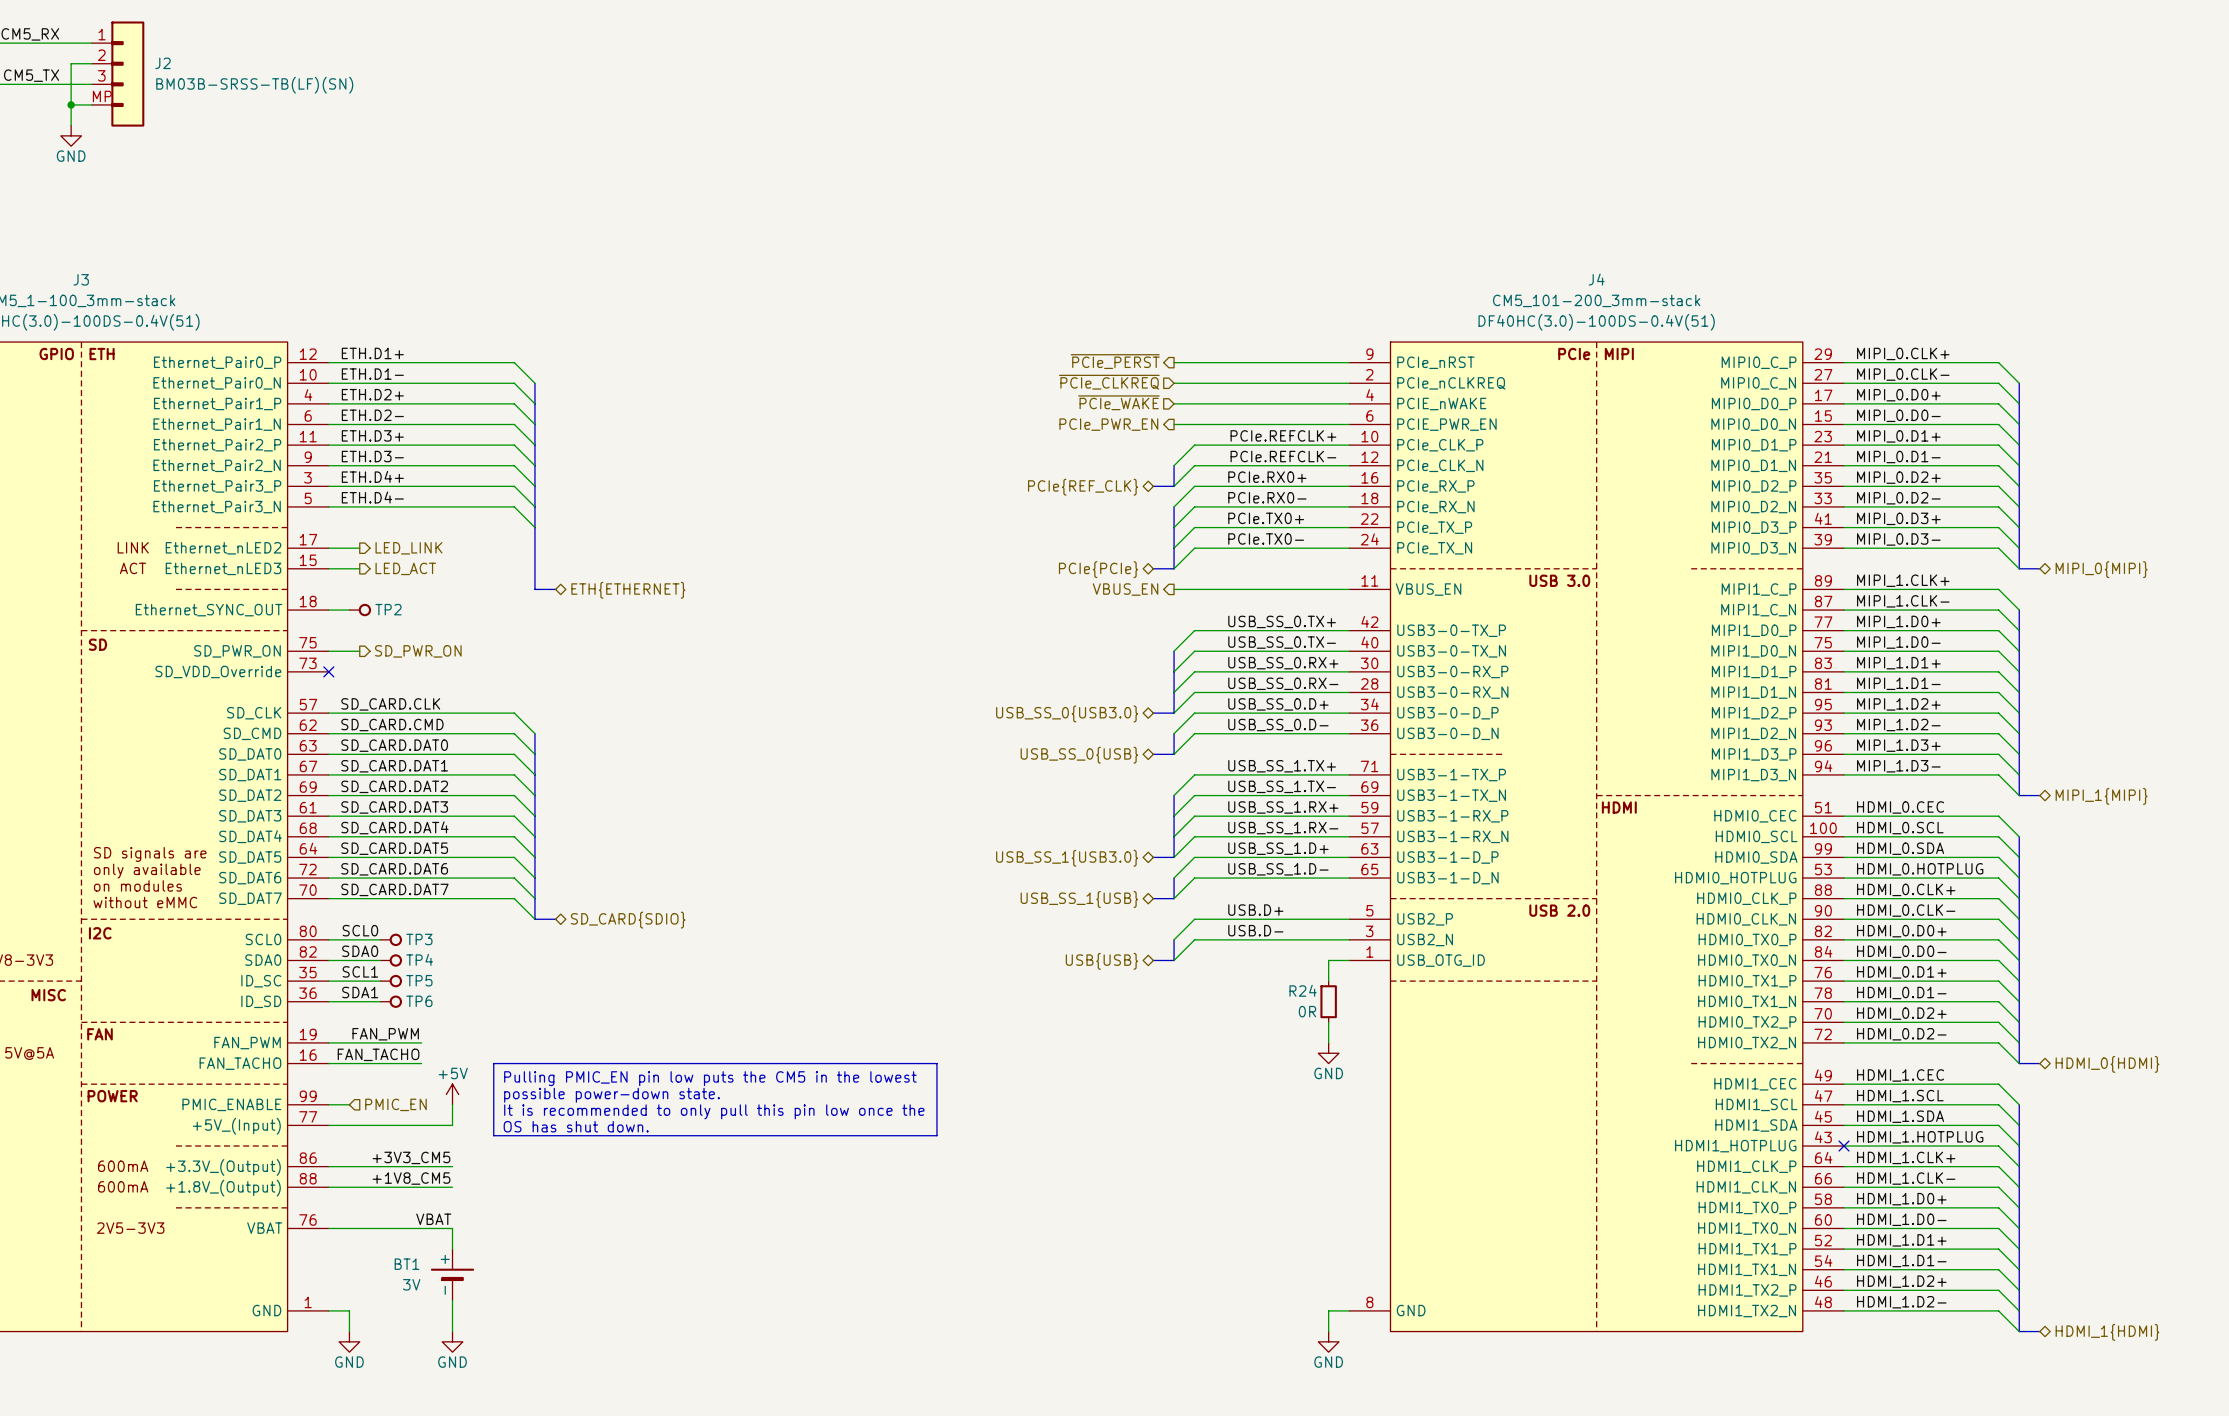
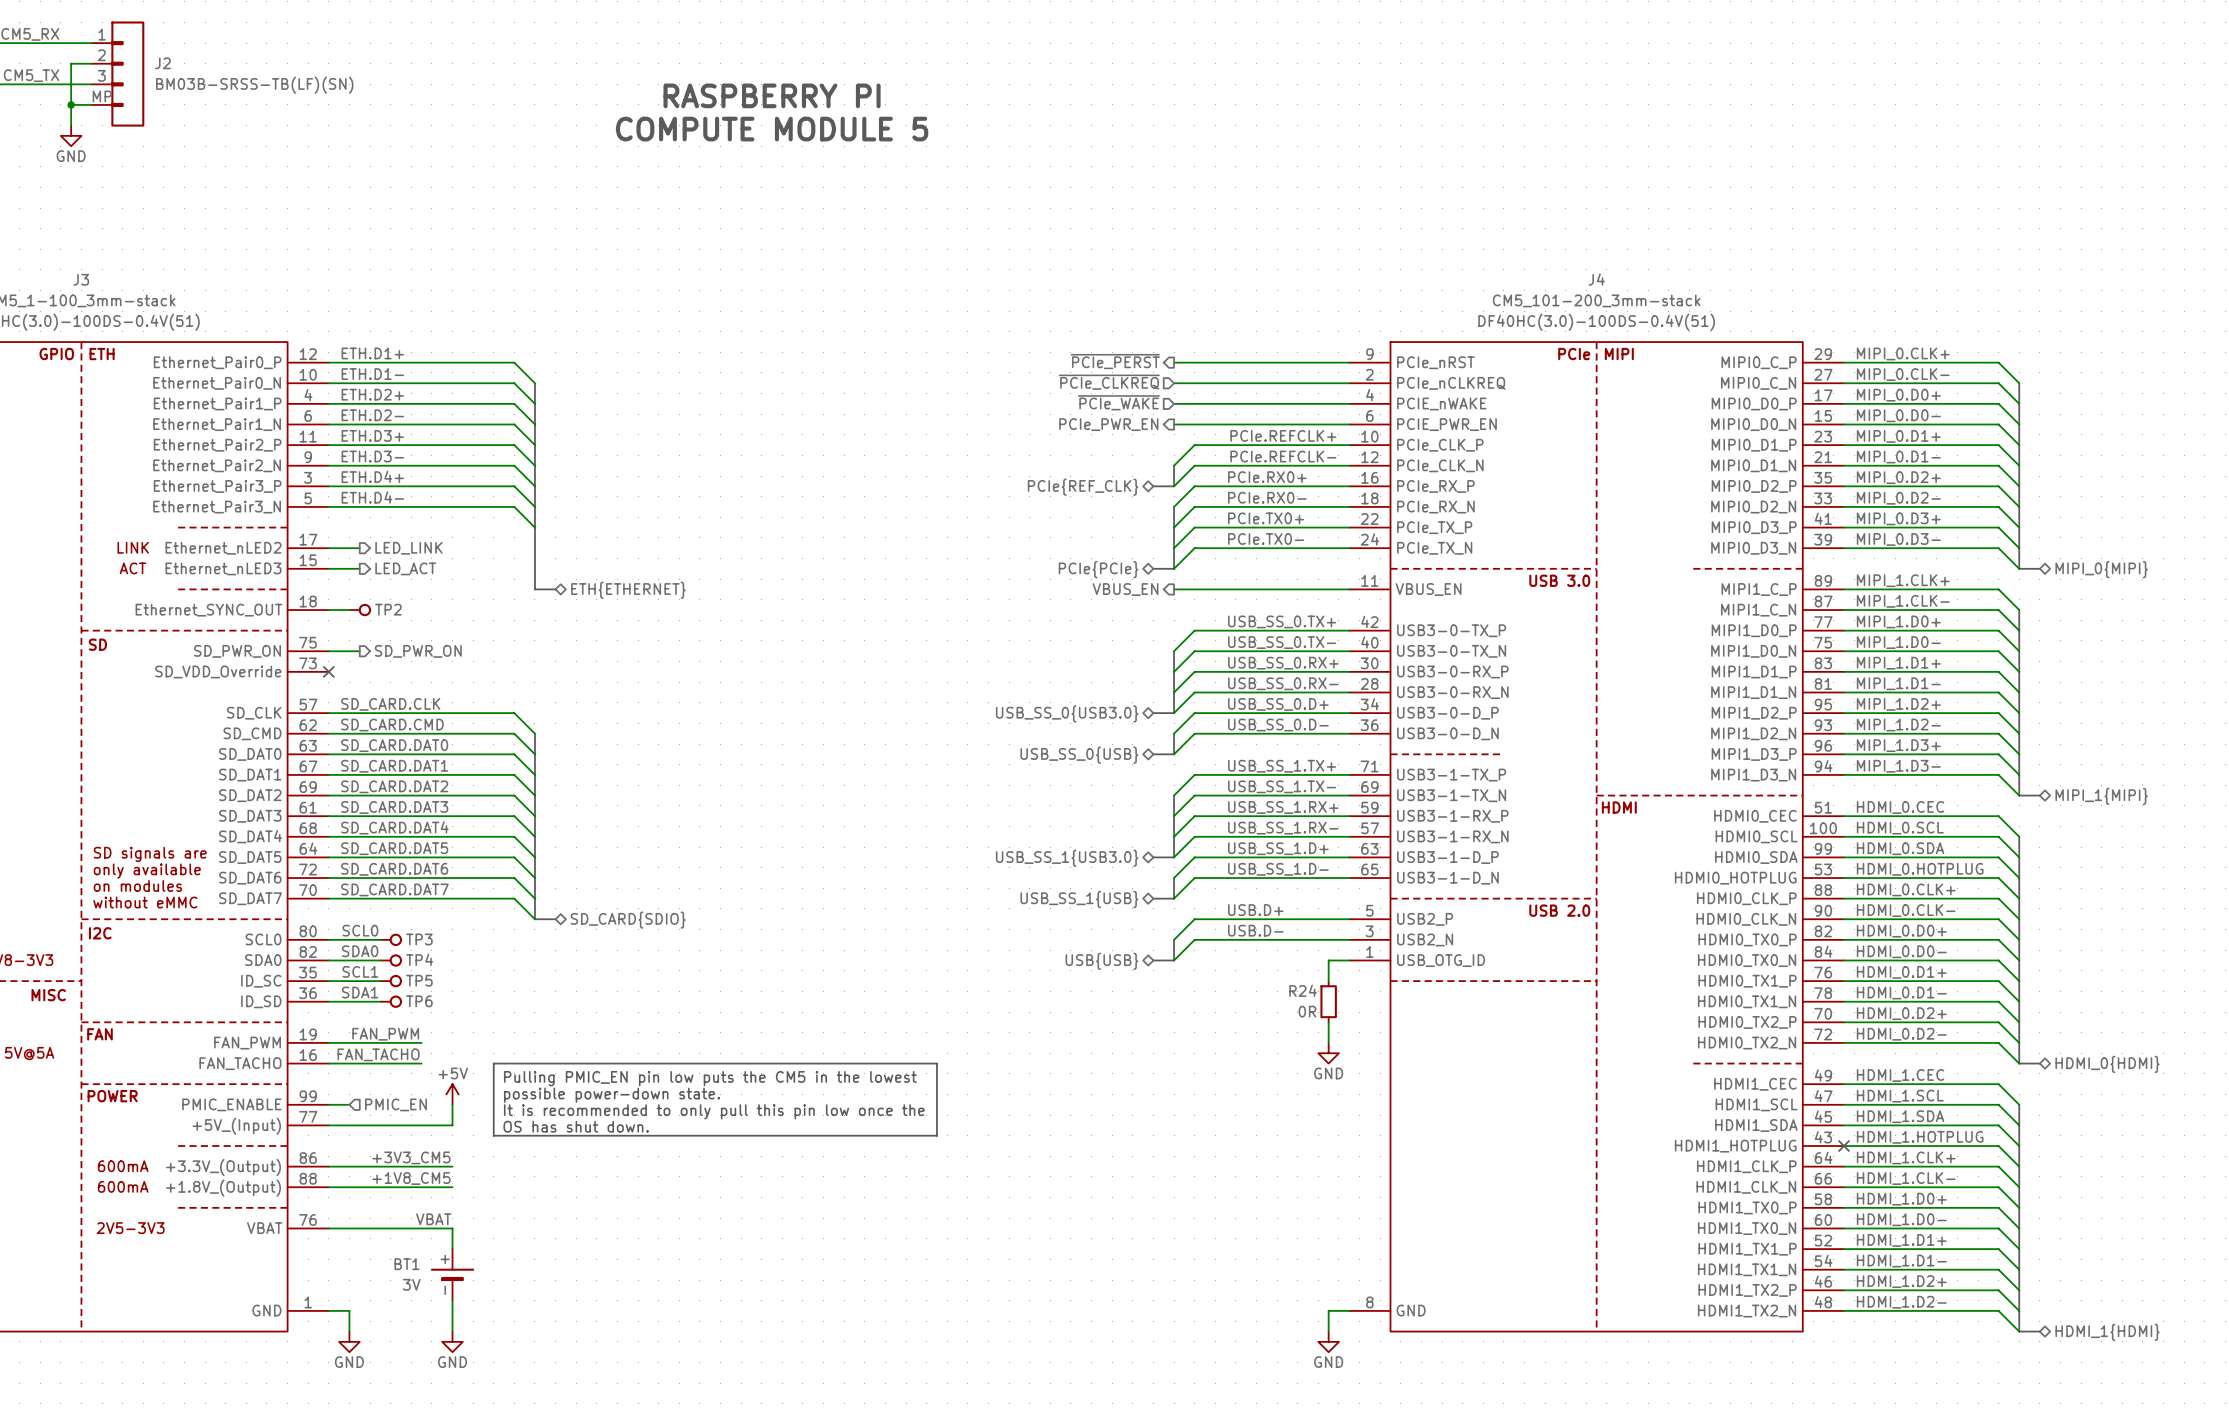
text: none -> RASPBERRY PI (772, 95)
text: none -> COMPUTE MODULE 5 (772, 129)

